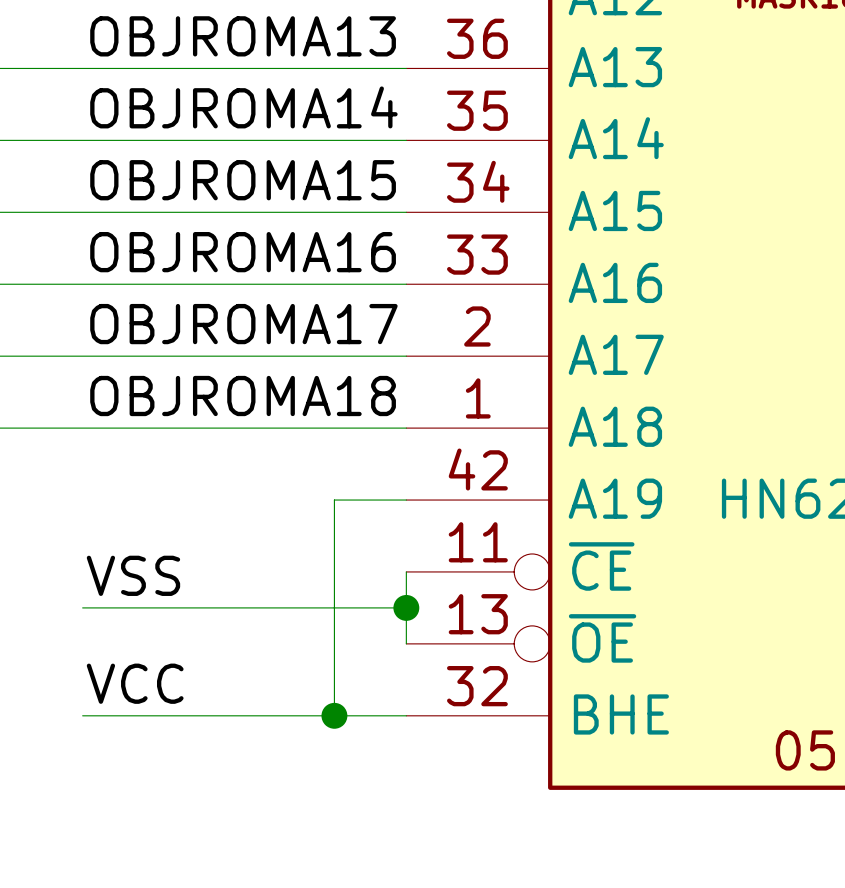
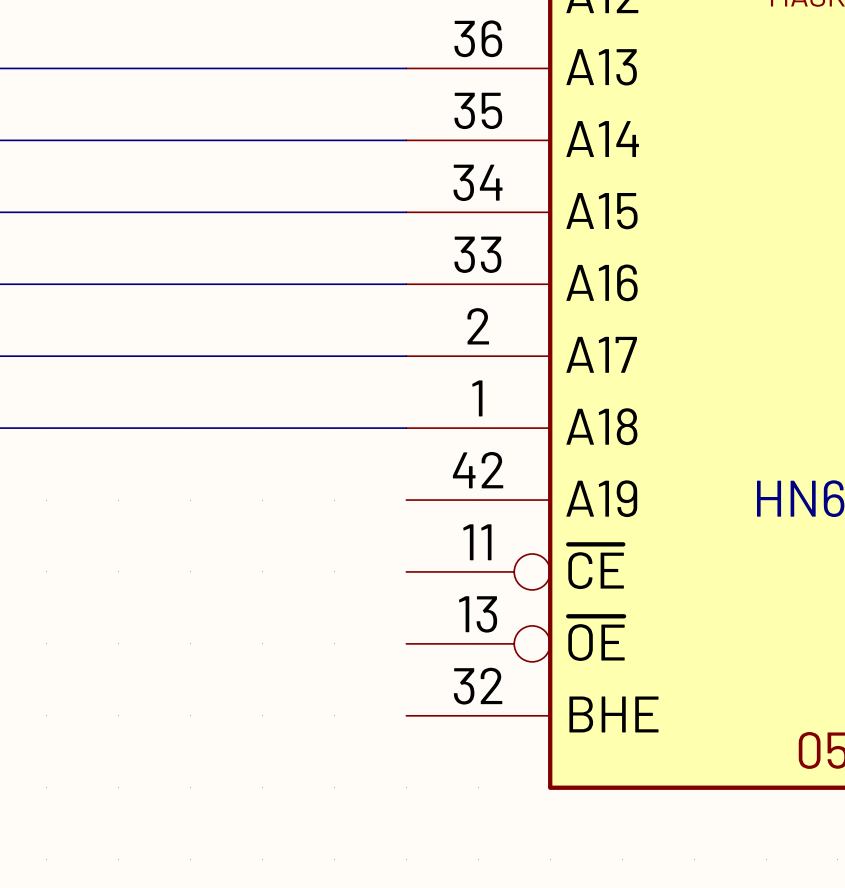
label: OBJROMA13 (243, 36) -> none
label: OBJROMA14 (243, 107) -> none
label: OBJROMA15 (243, 180) -> none
label: OBJROMA16 (243, 252) -> none
label: OBJROMA17 (243, 324) -> none
label: OBJROMA18 (243, 396) -> none
wire: (406, 500) (334, 500) (334, 715) -> none
wire: (406, 571) (406, 643) -> none
label: VSS (133, 575) -> none
wire: (82, 607) (406, 607) -> none
junction: (406, 607) -> none
label: VCC (135, 683) -> none
wire: (82, 715) (406, 715) -> none
junction: (334, 715) -> none

